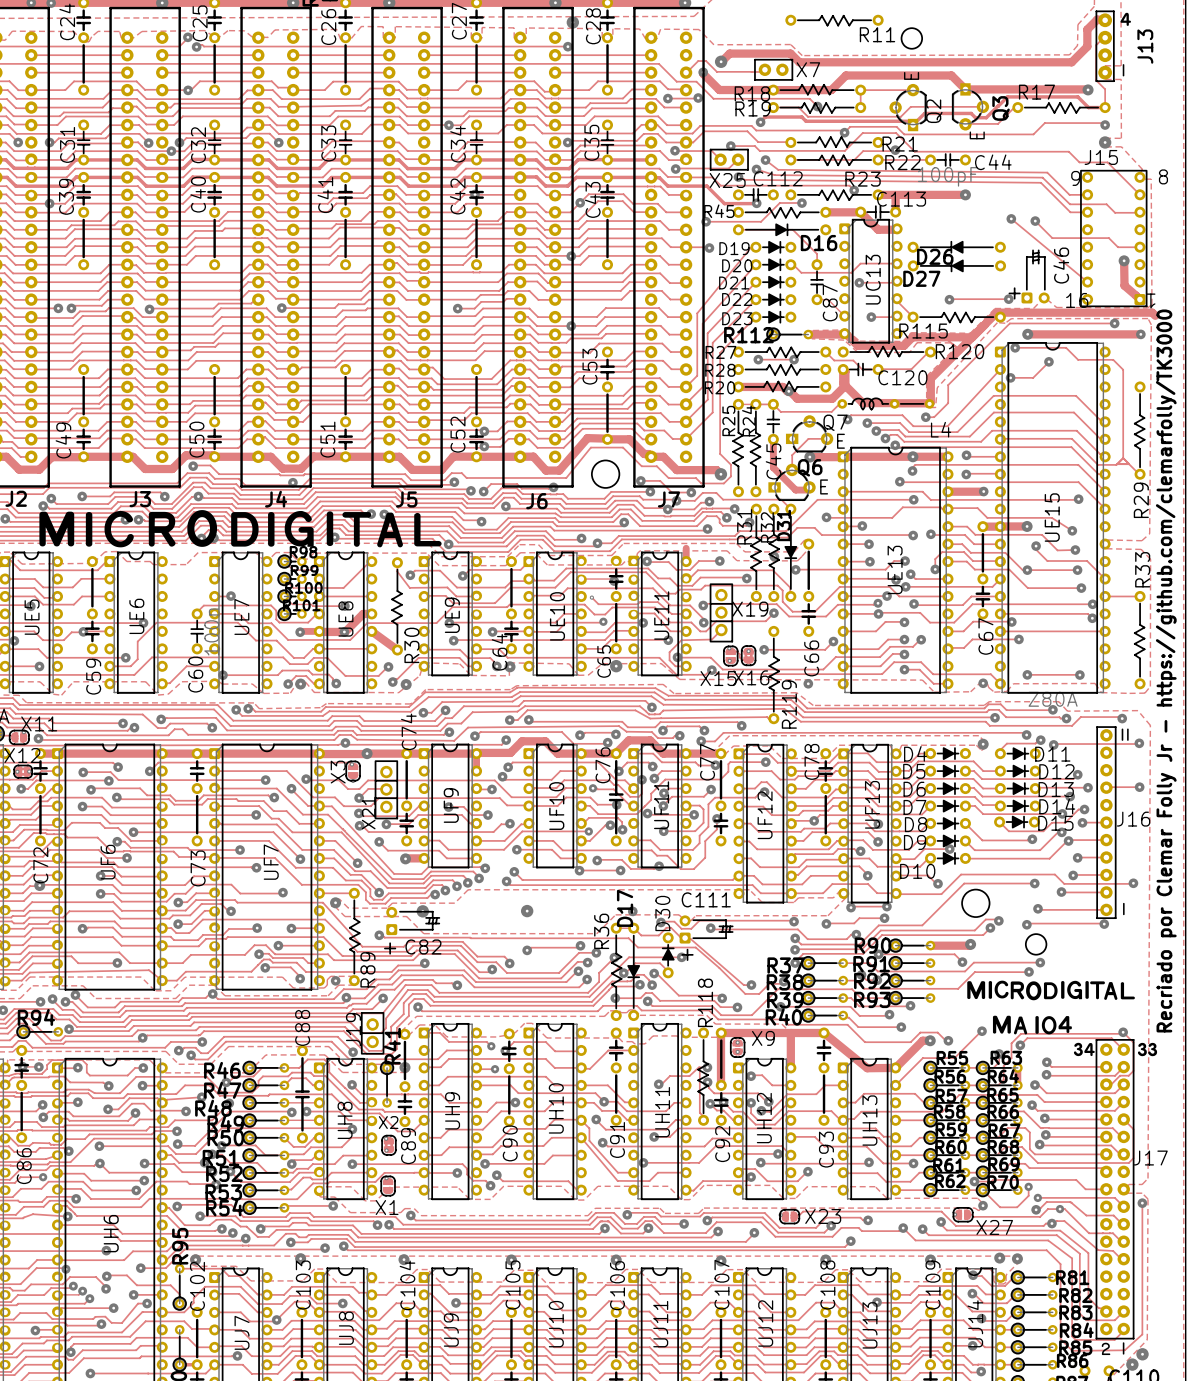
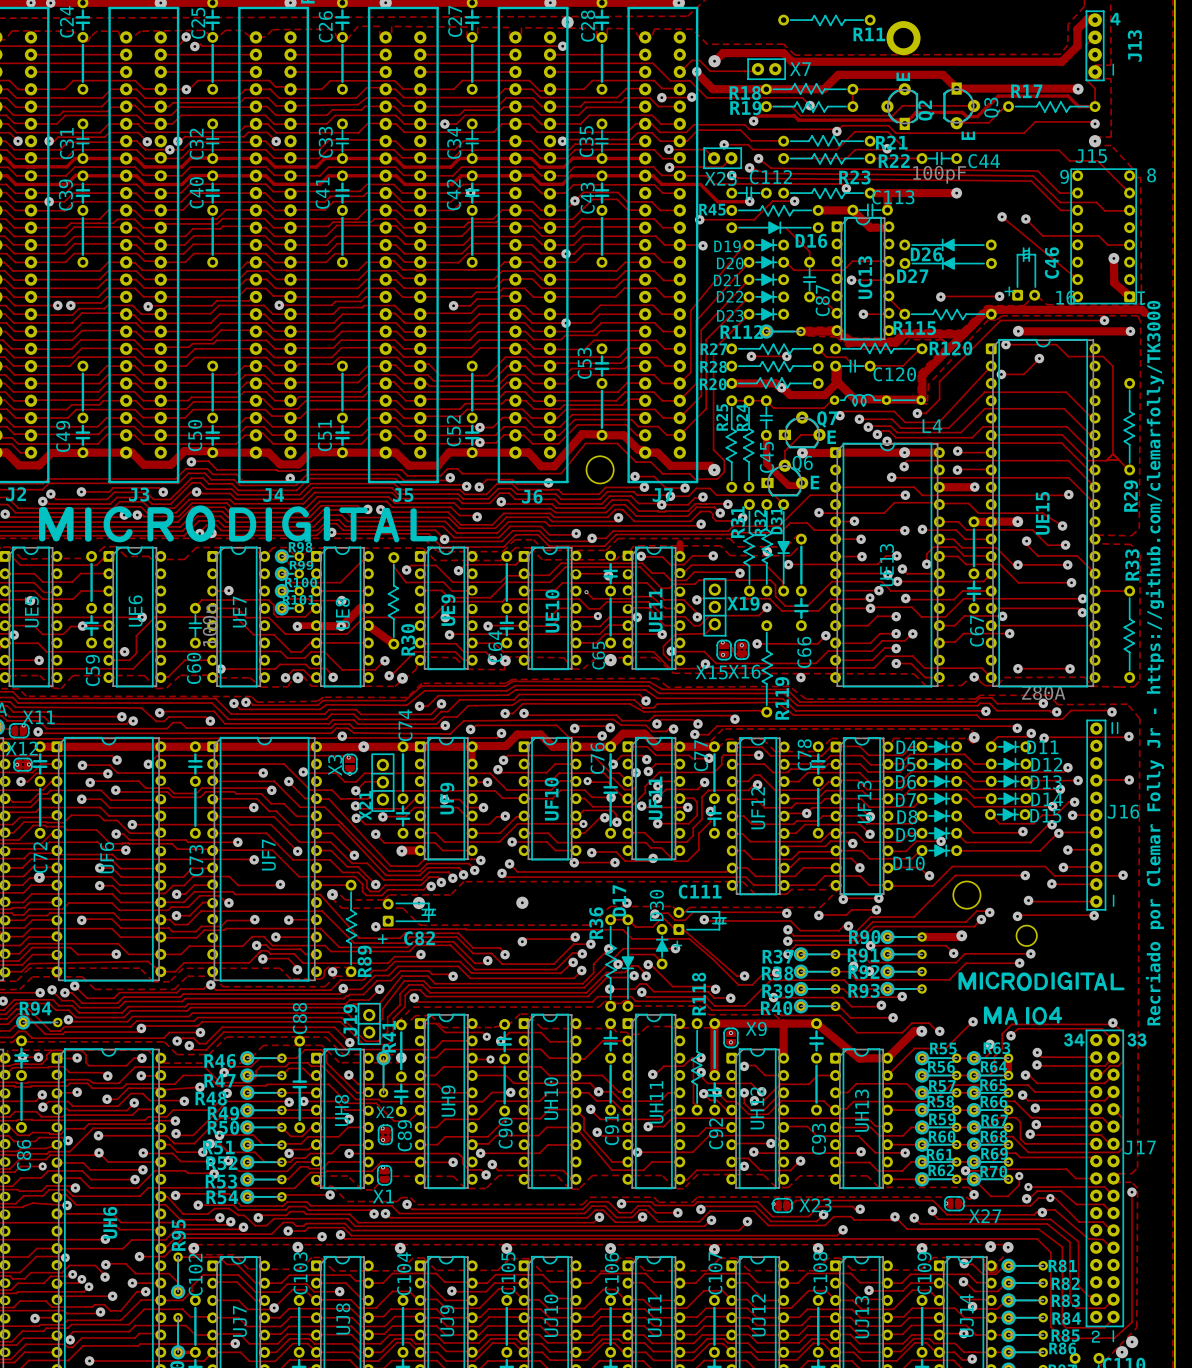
round board edge: [900, 27, 924, 50] -> none
part: none -> (903, 38)

